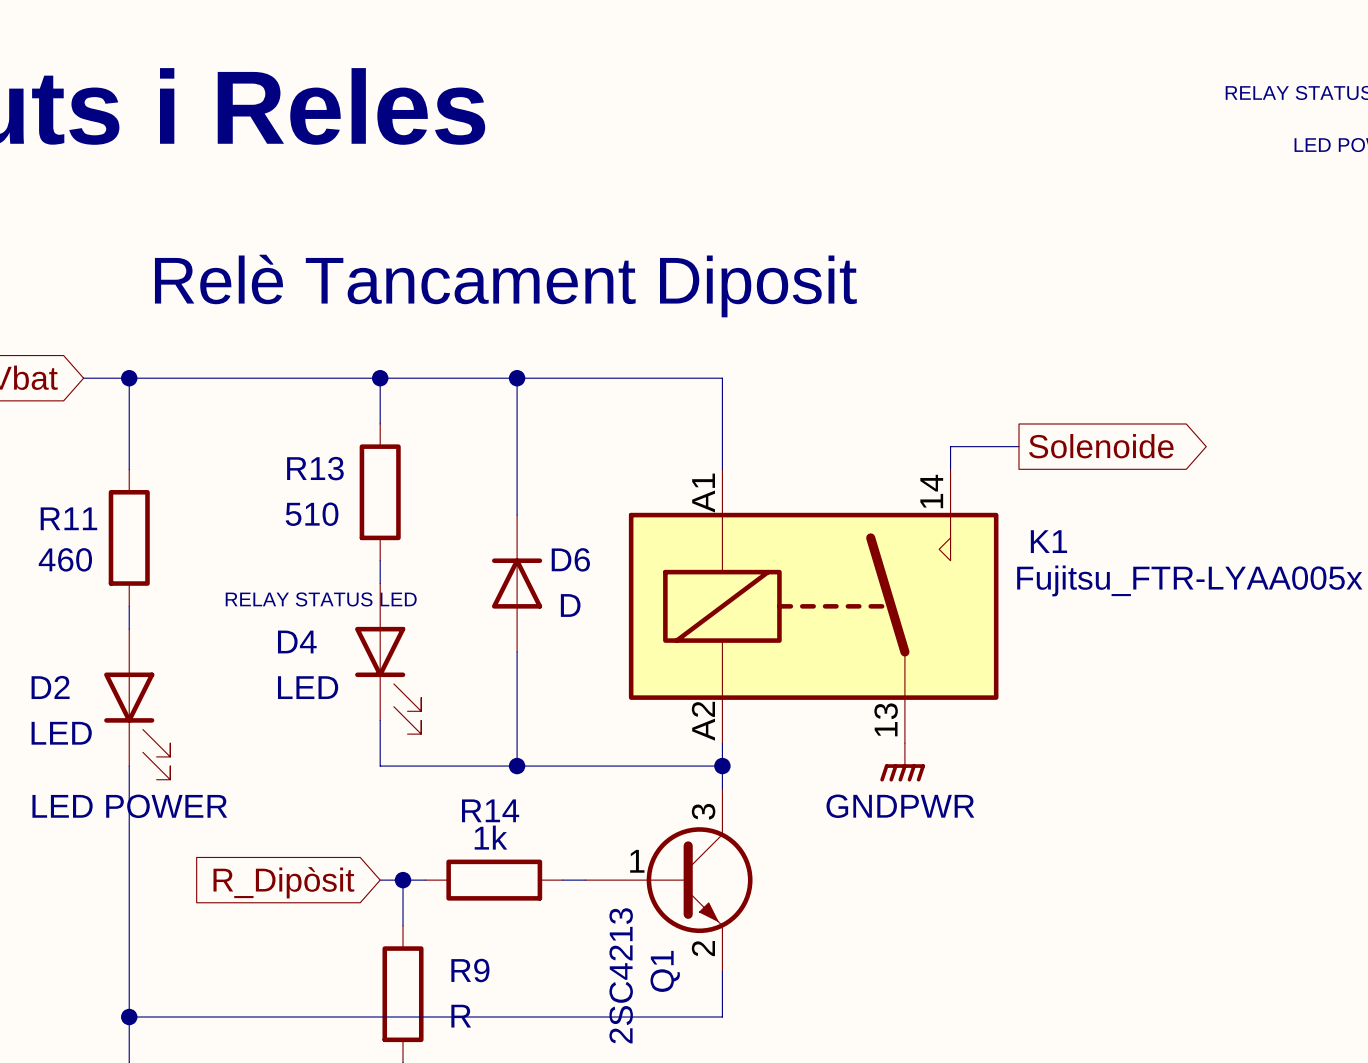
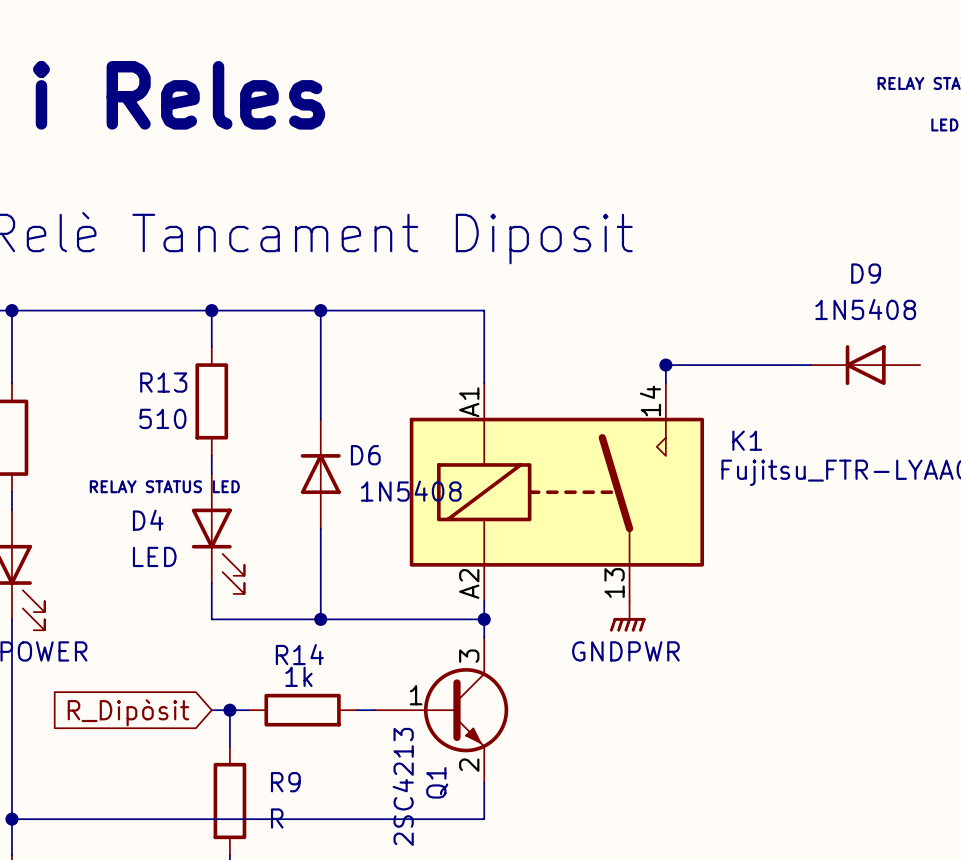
junction: none -> (665, 365)
wire: none -> (720, 365) (811, 365)
global label: Solenoide (1101, 446) -> none
D9: none -> 1N5408 (865, 365)
D6 value: D (570, 605) -> 1N5408 (411, 491)

